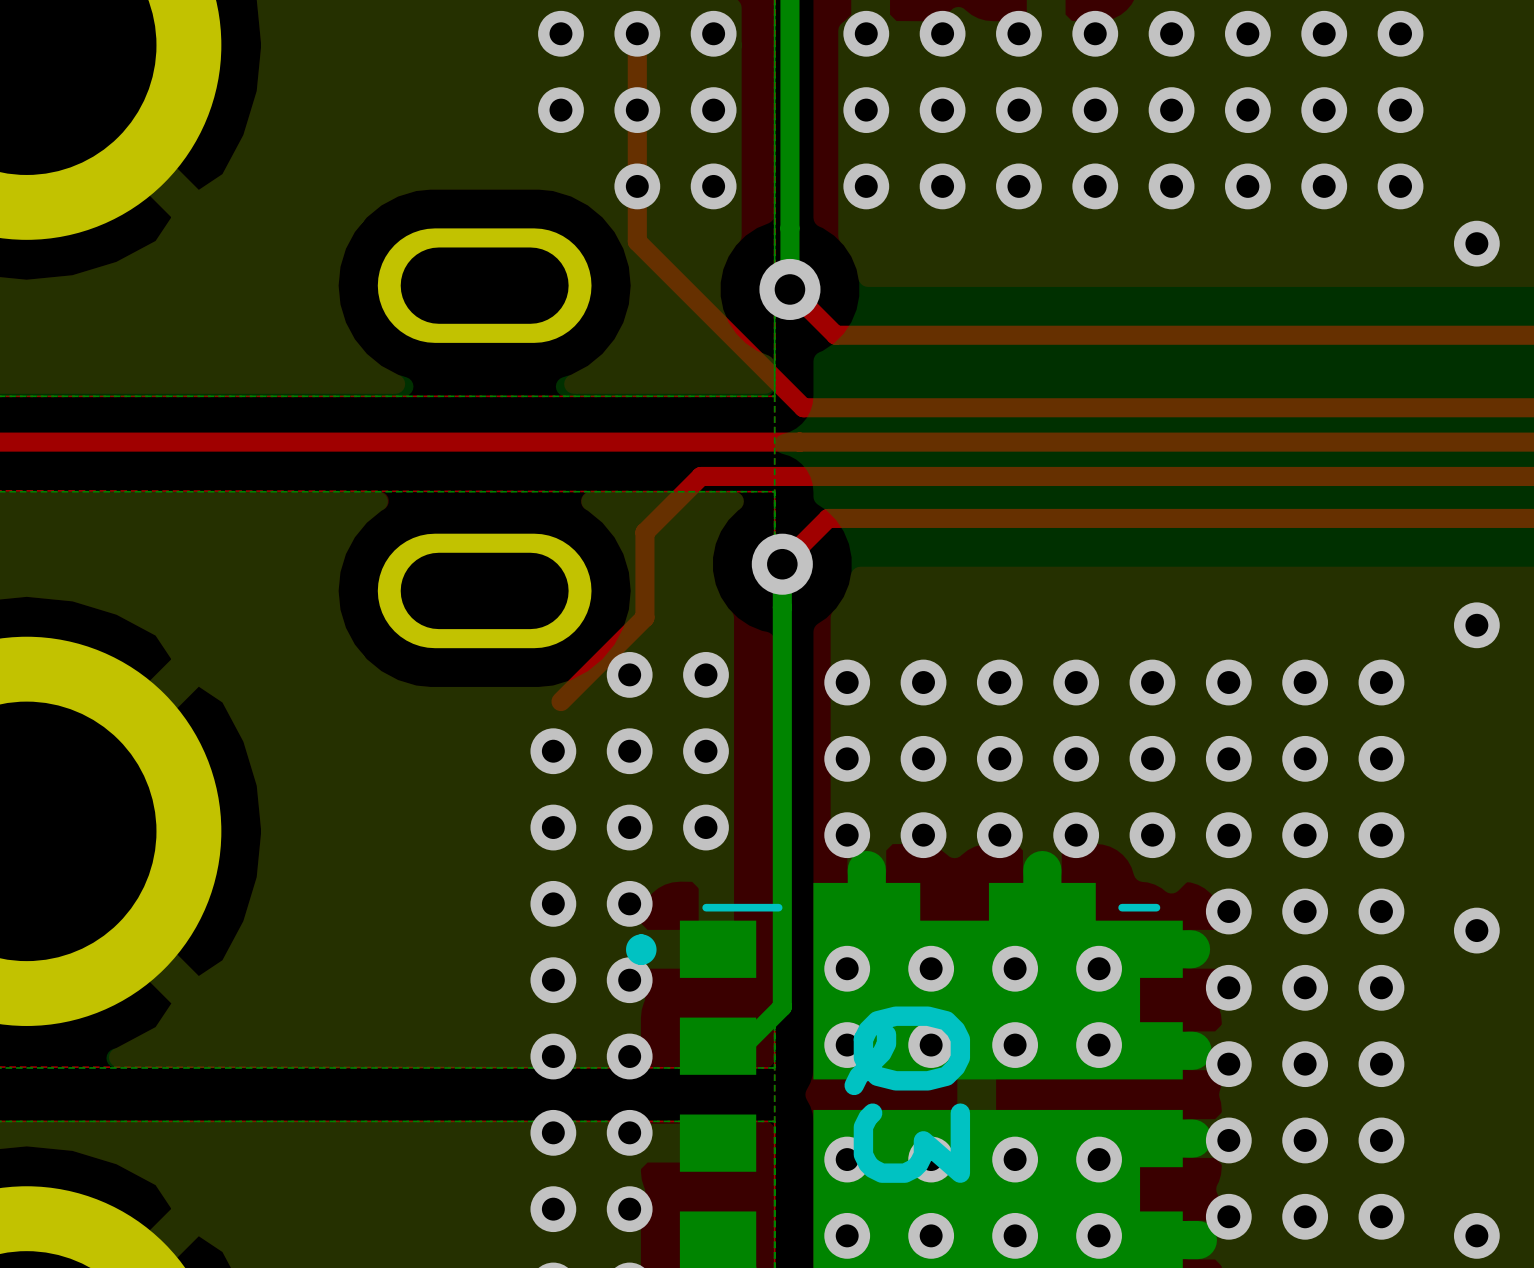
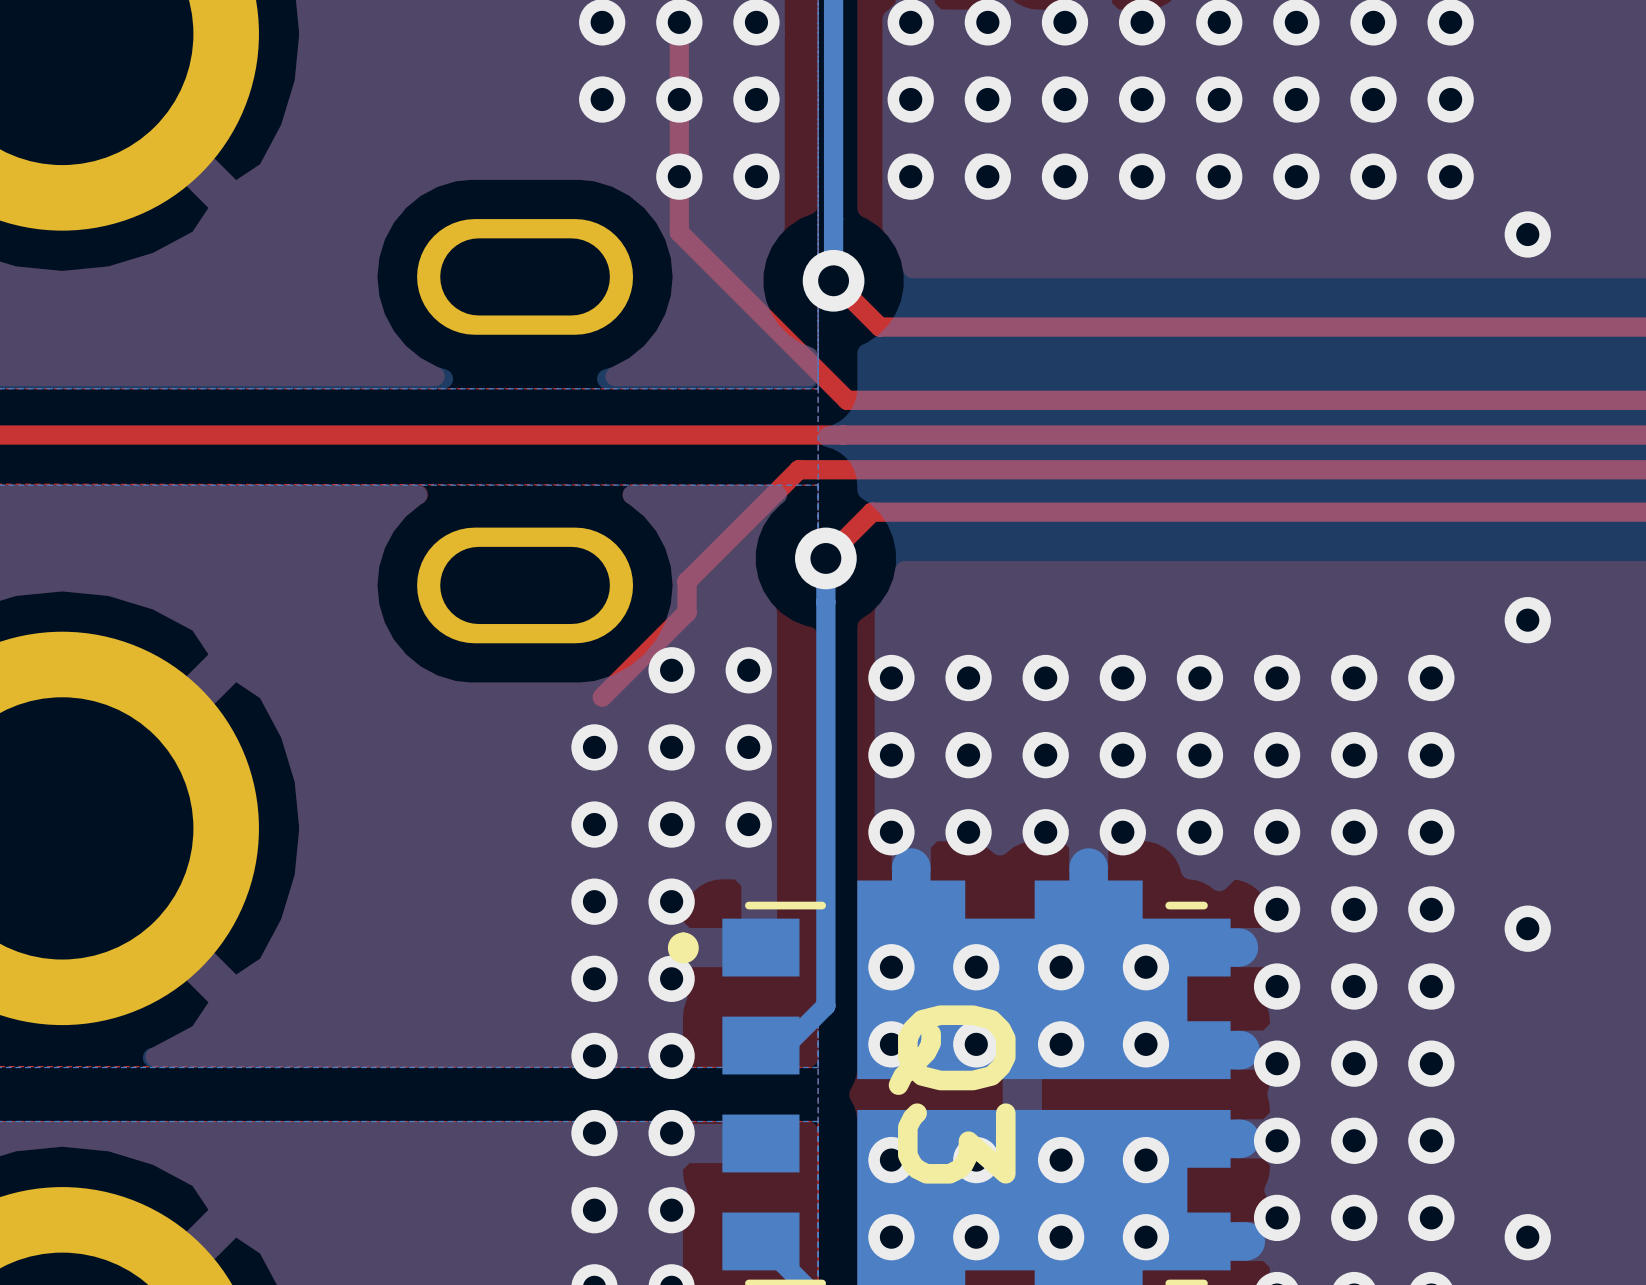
top track: (755, 476) (700, 476) (644, 532) (644, 587) -> (798, 469) (687, 581)

